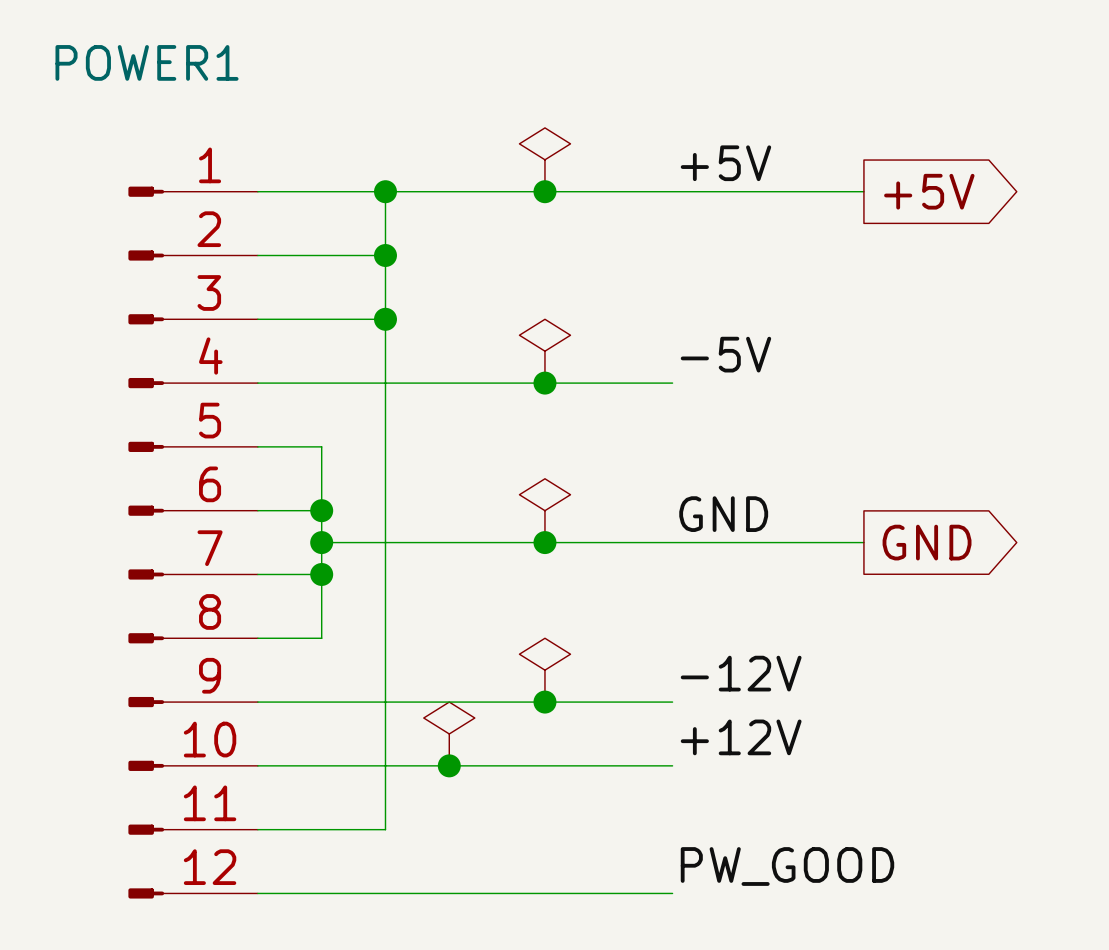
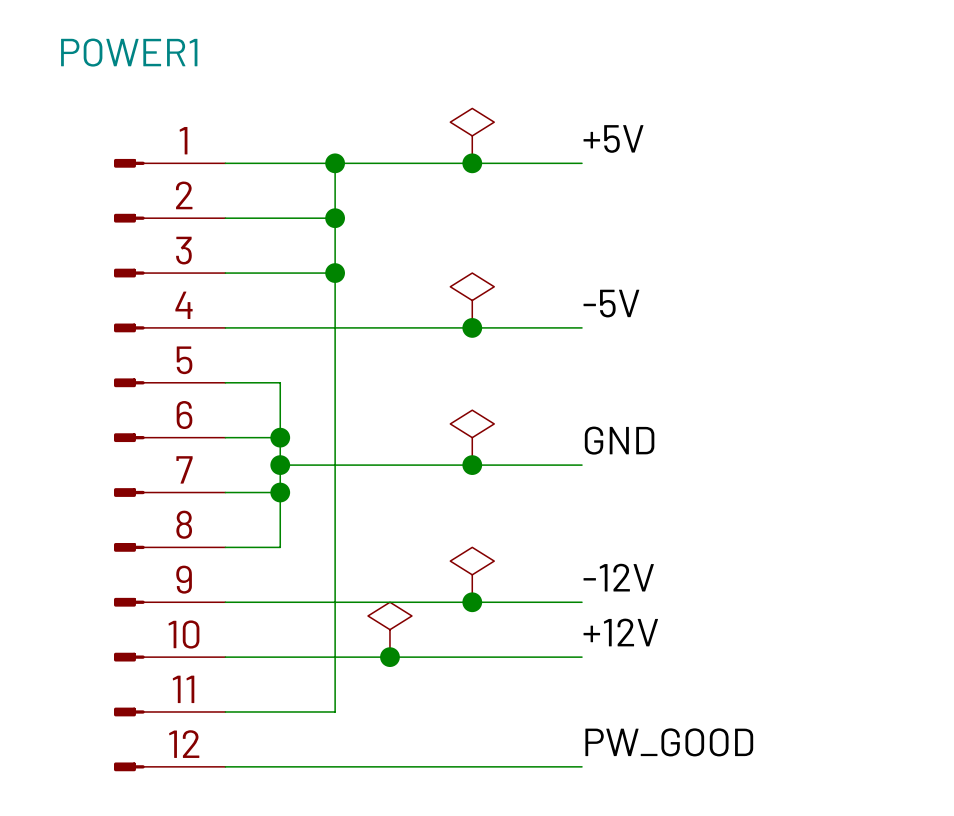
wire: (672, 191) (863, 191) -> none
global label: +5V (929, 191) -> none
wire: (672, 542) (863, 542) -> none
global label: GND (927, 542) -> none

